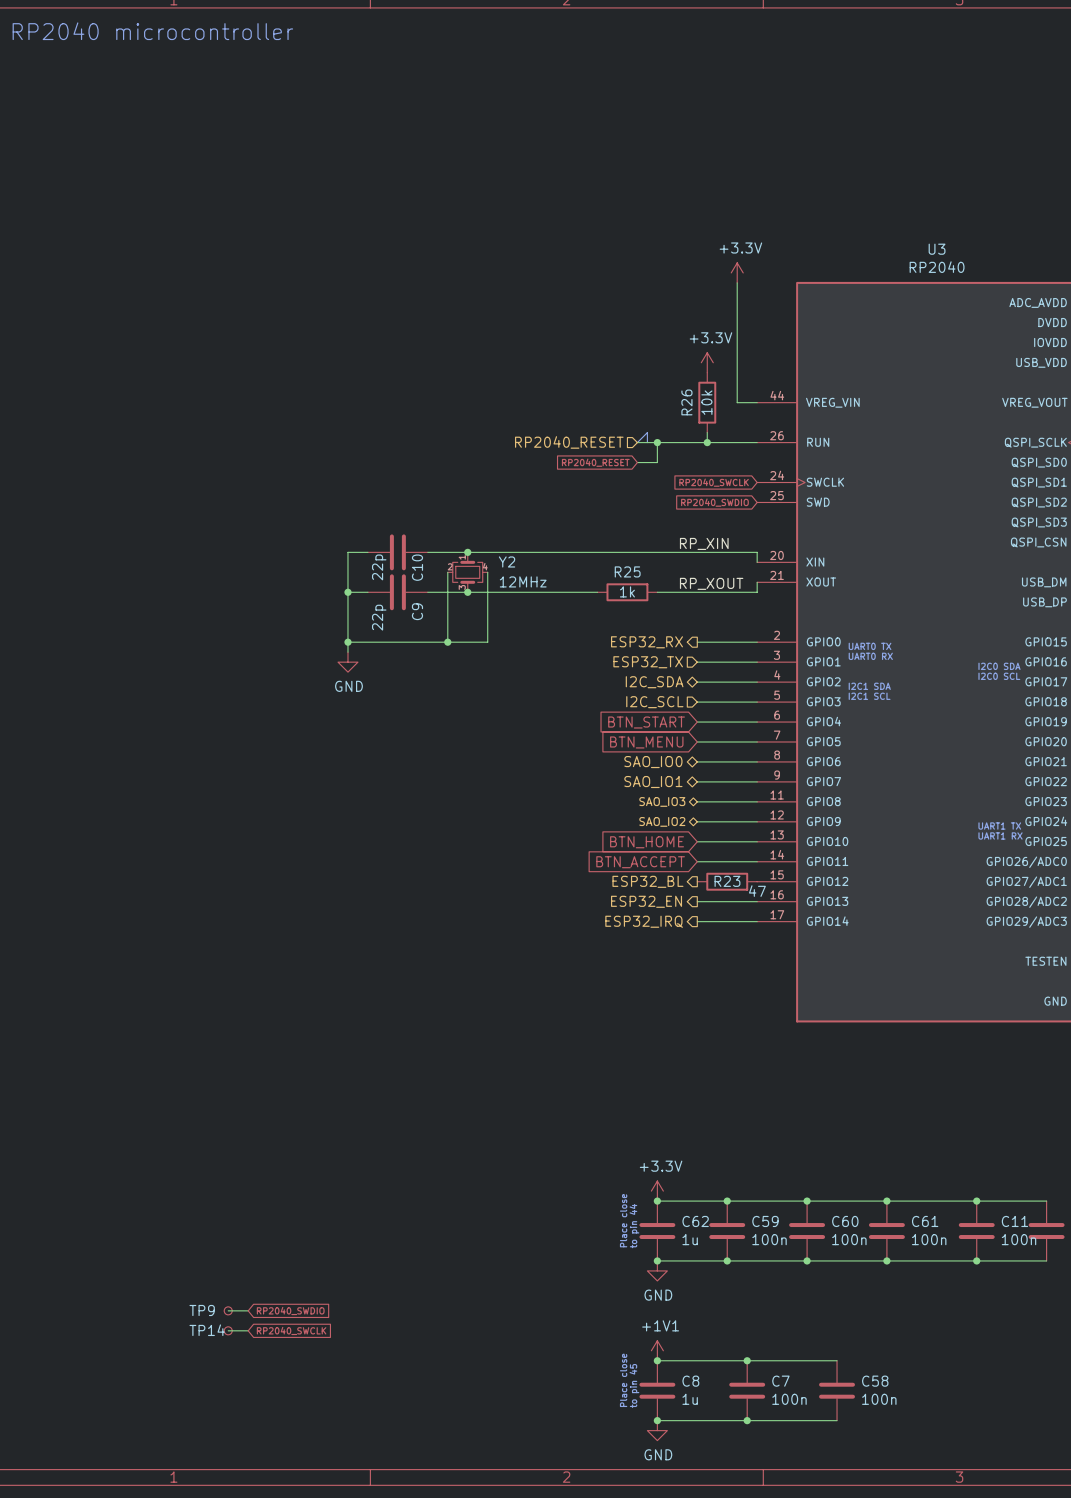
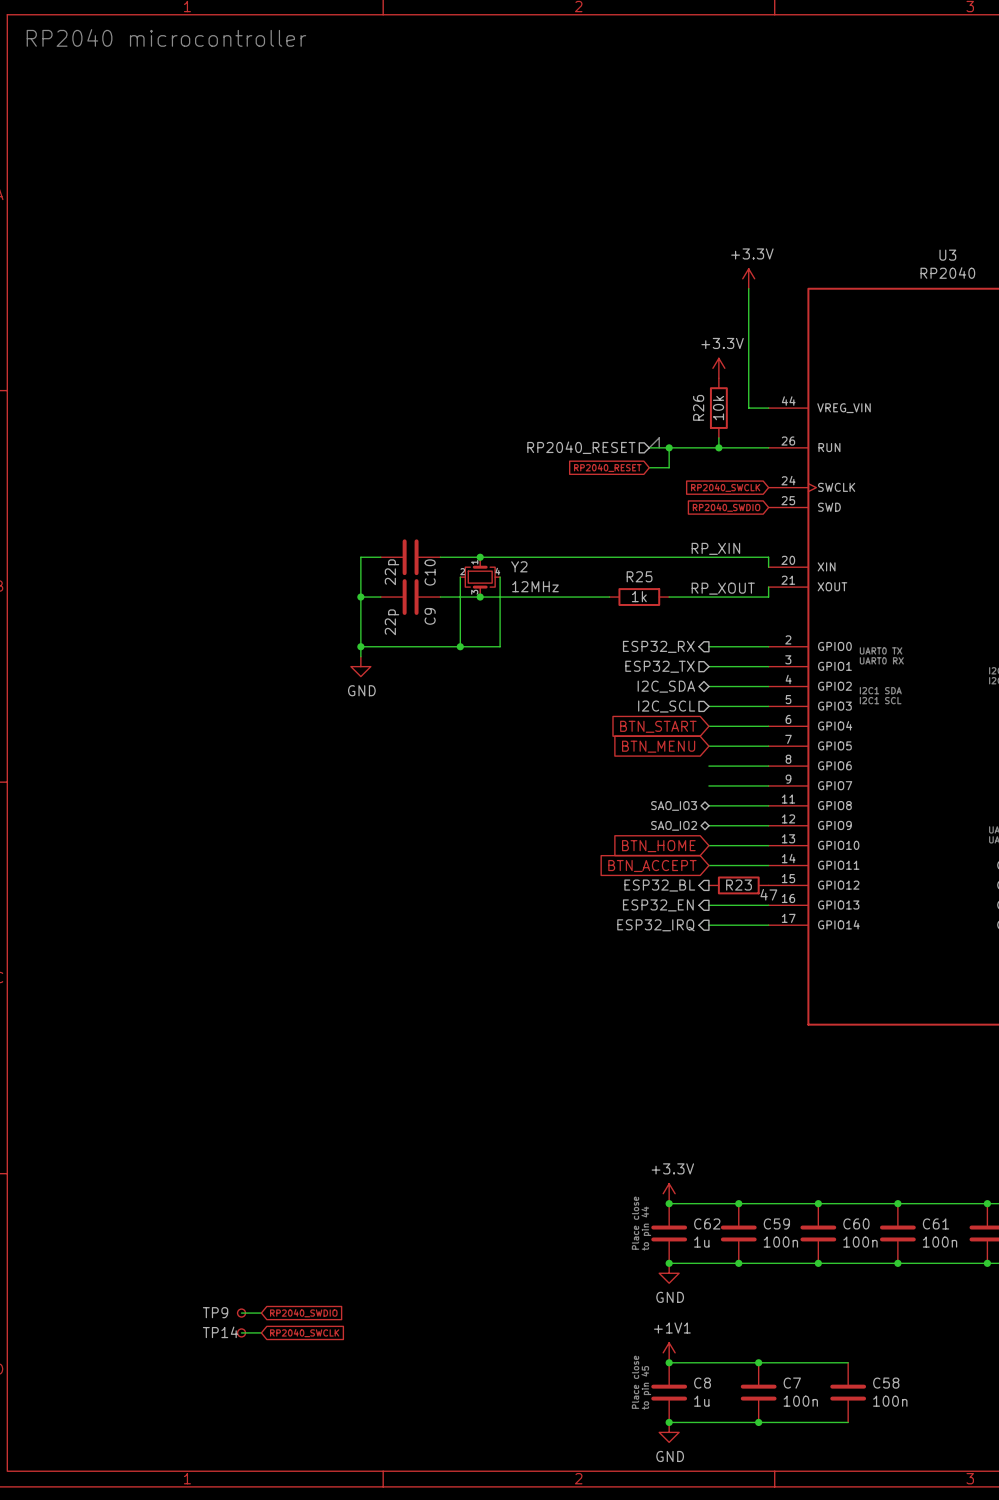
hierarchical label: SAO_IO0 (653, 762) -> none
hierarchical label: SAO_IO1 (653, 782) -> none

